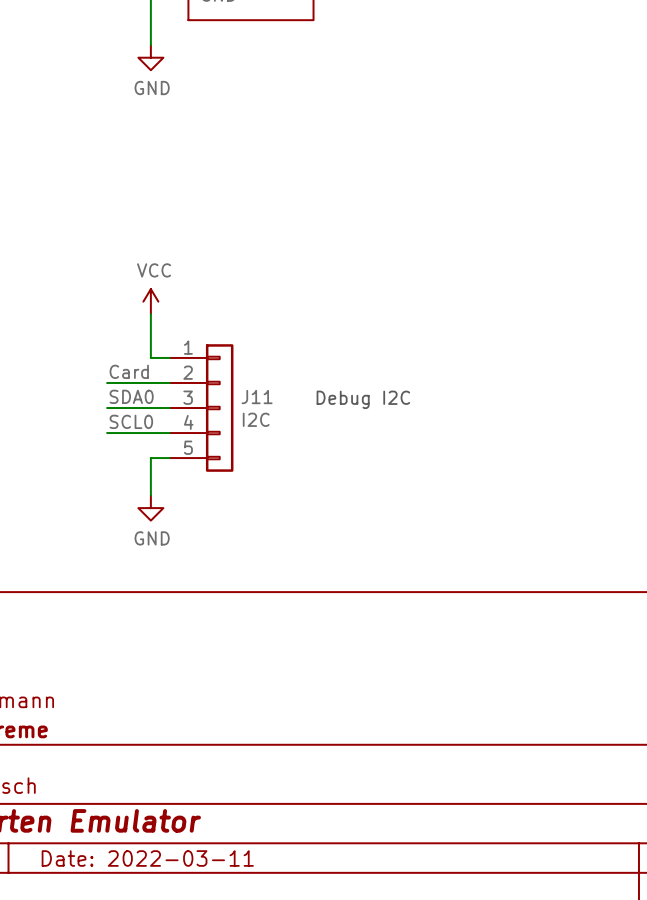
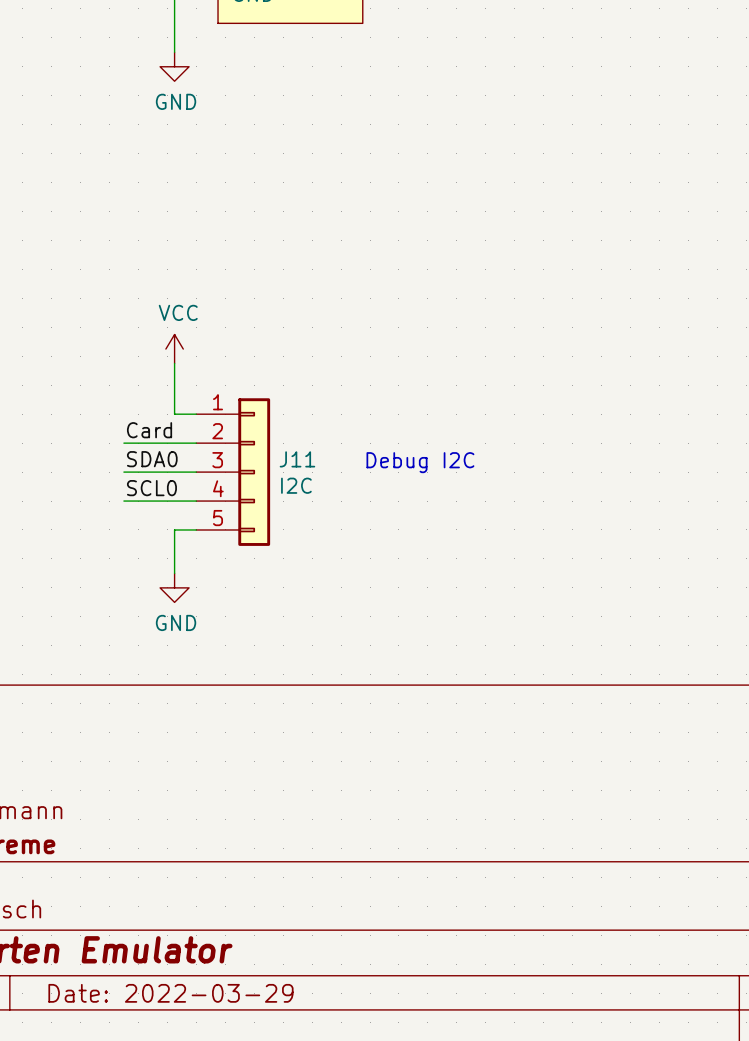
title block: Date: 2022-03-11 (147, 858) -> Date: 2022-03-29 (170, 993)

